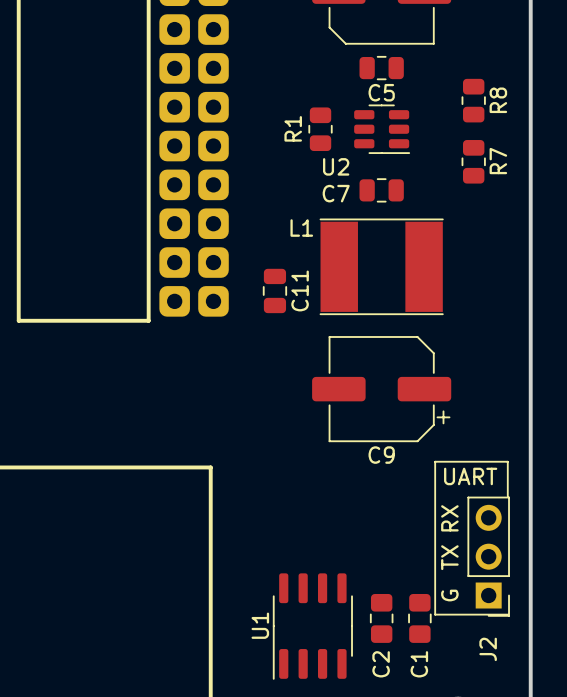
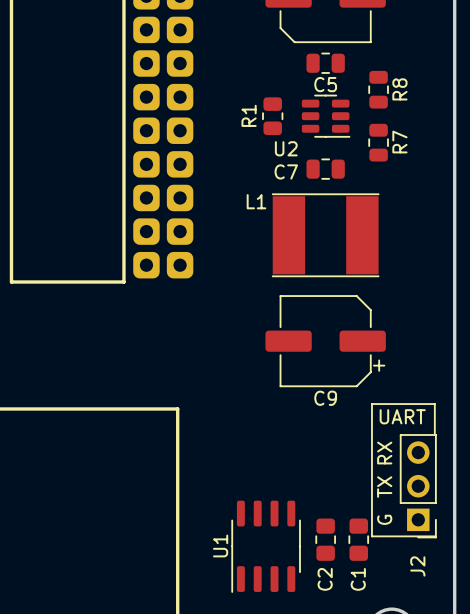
R8 footprint: [461, 78, 486, 123] -> [368, 70, 389, 109]
R7 footprint: [461, 140, 486, 184] -> [368, 123, 389, 162]
C11: (274, 290) -> none

